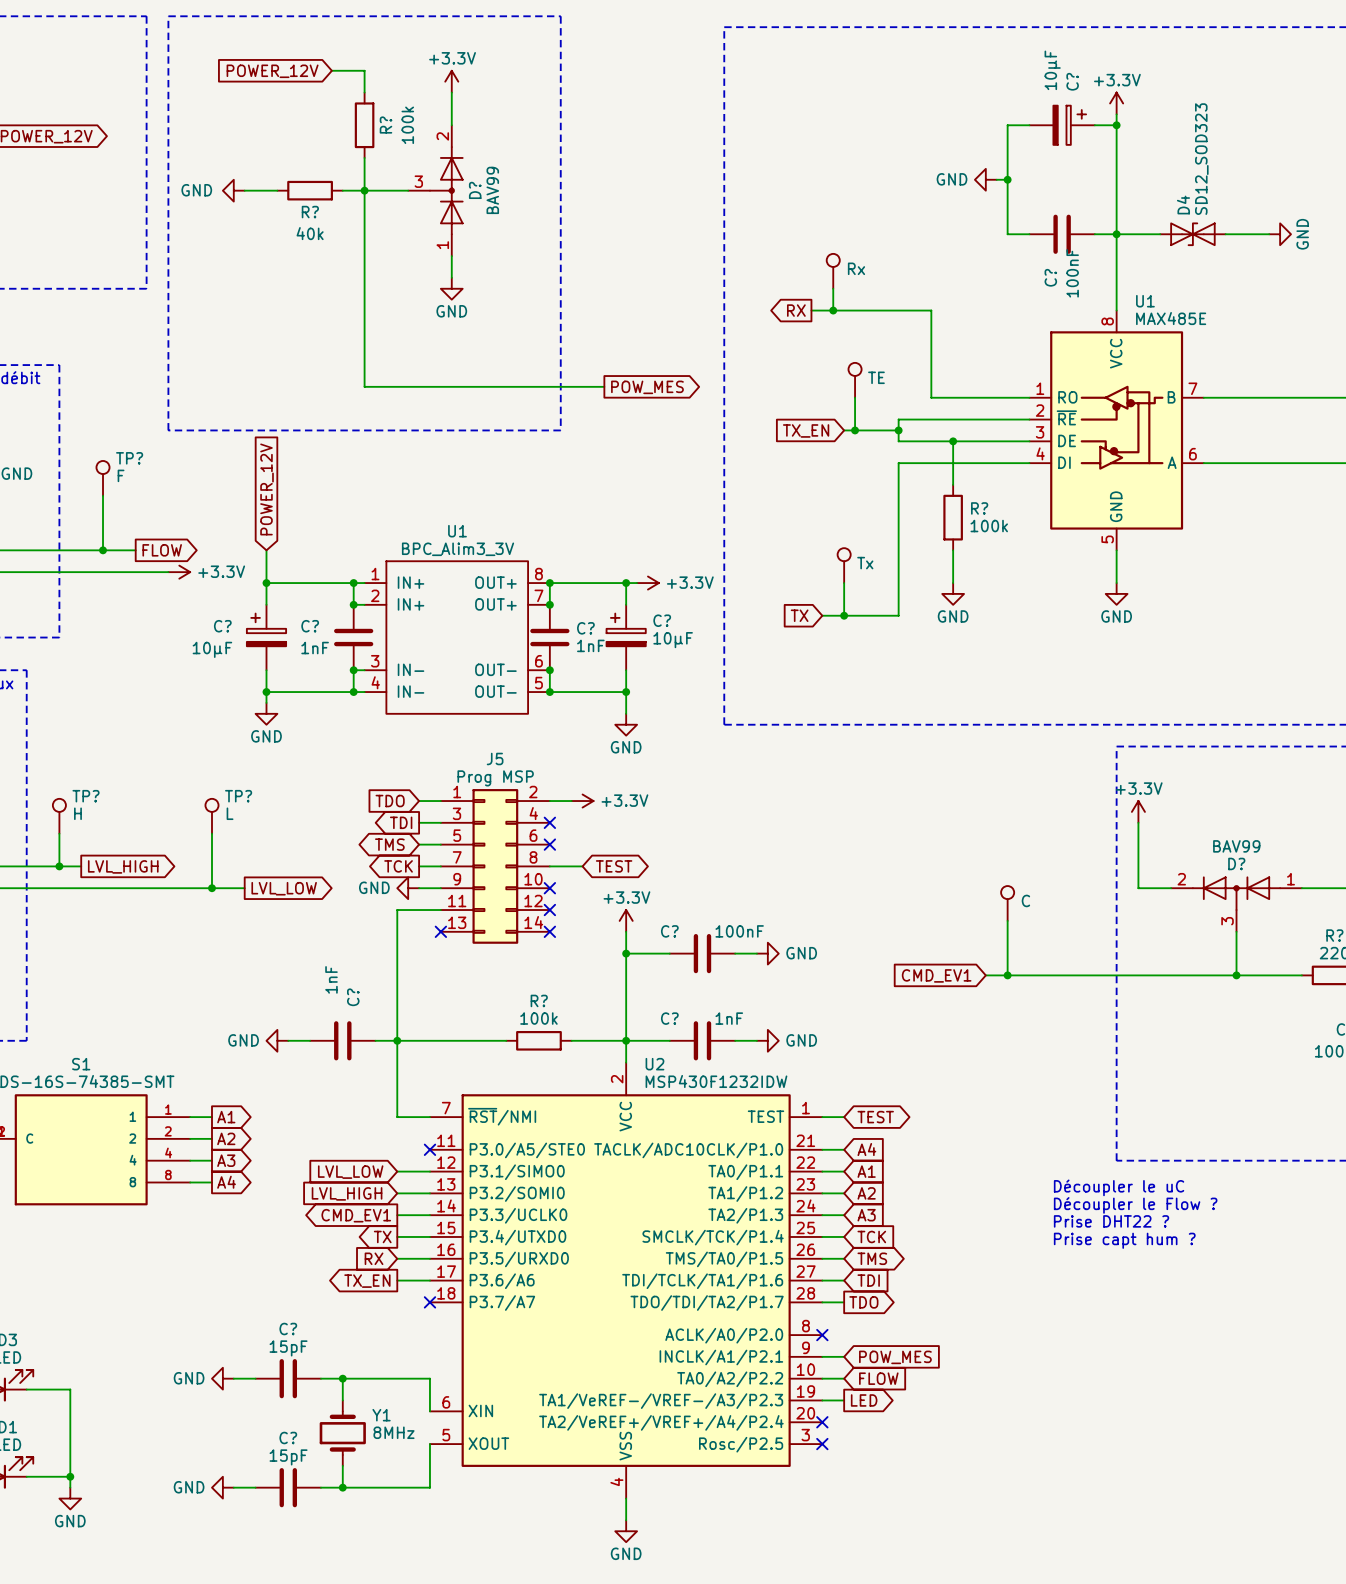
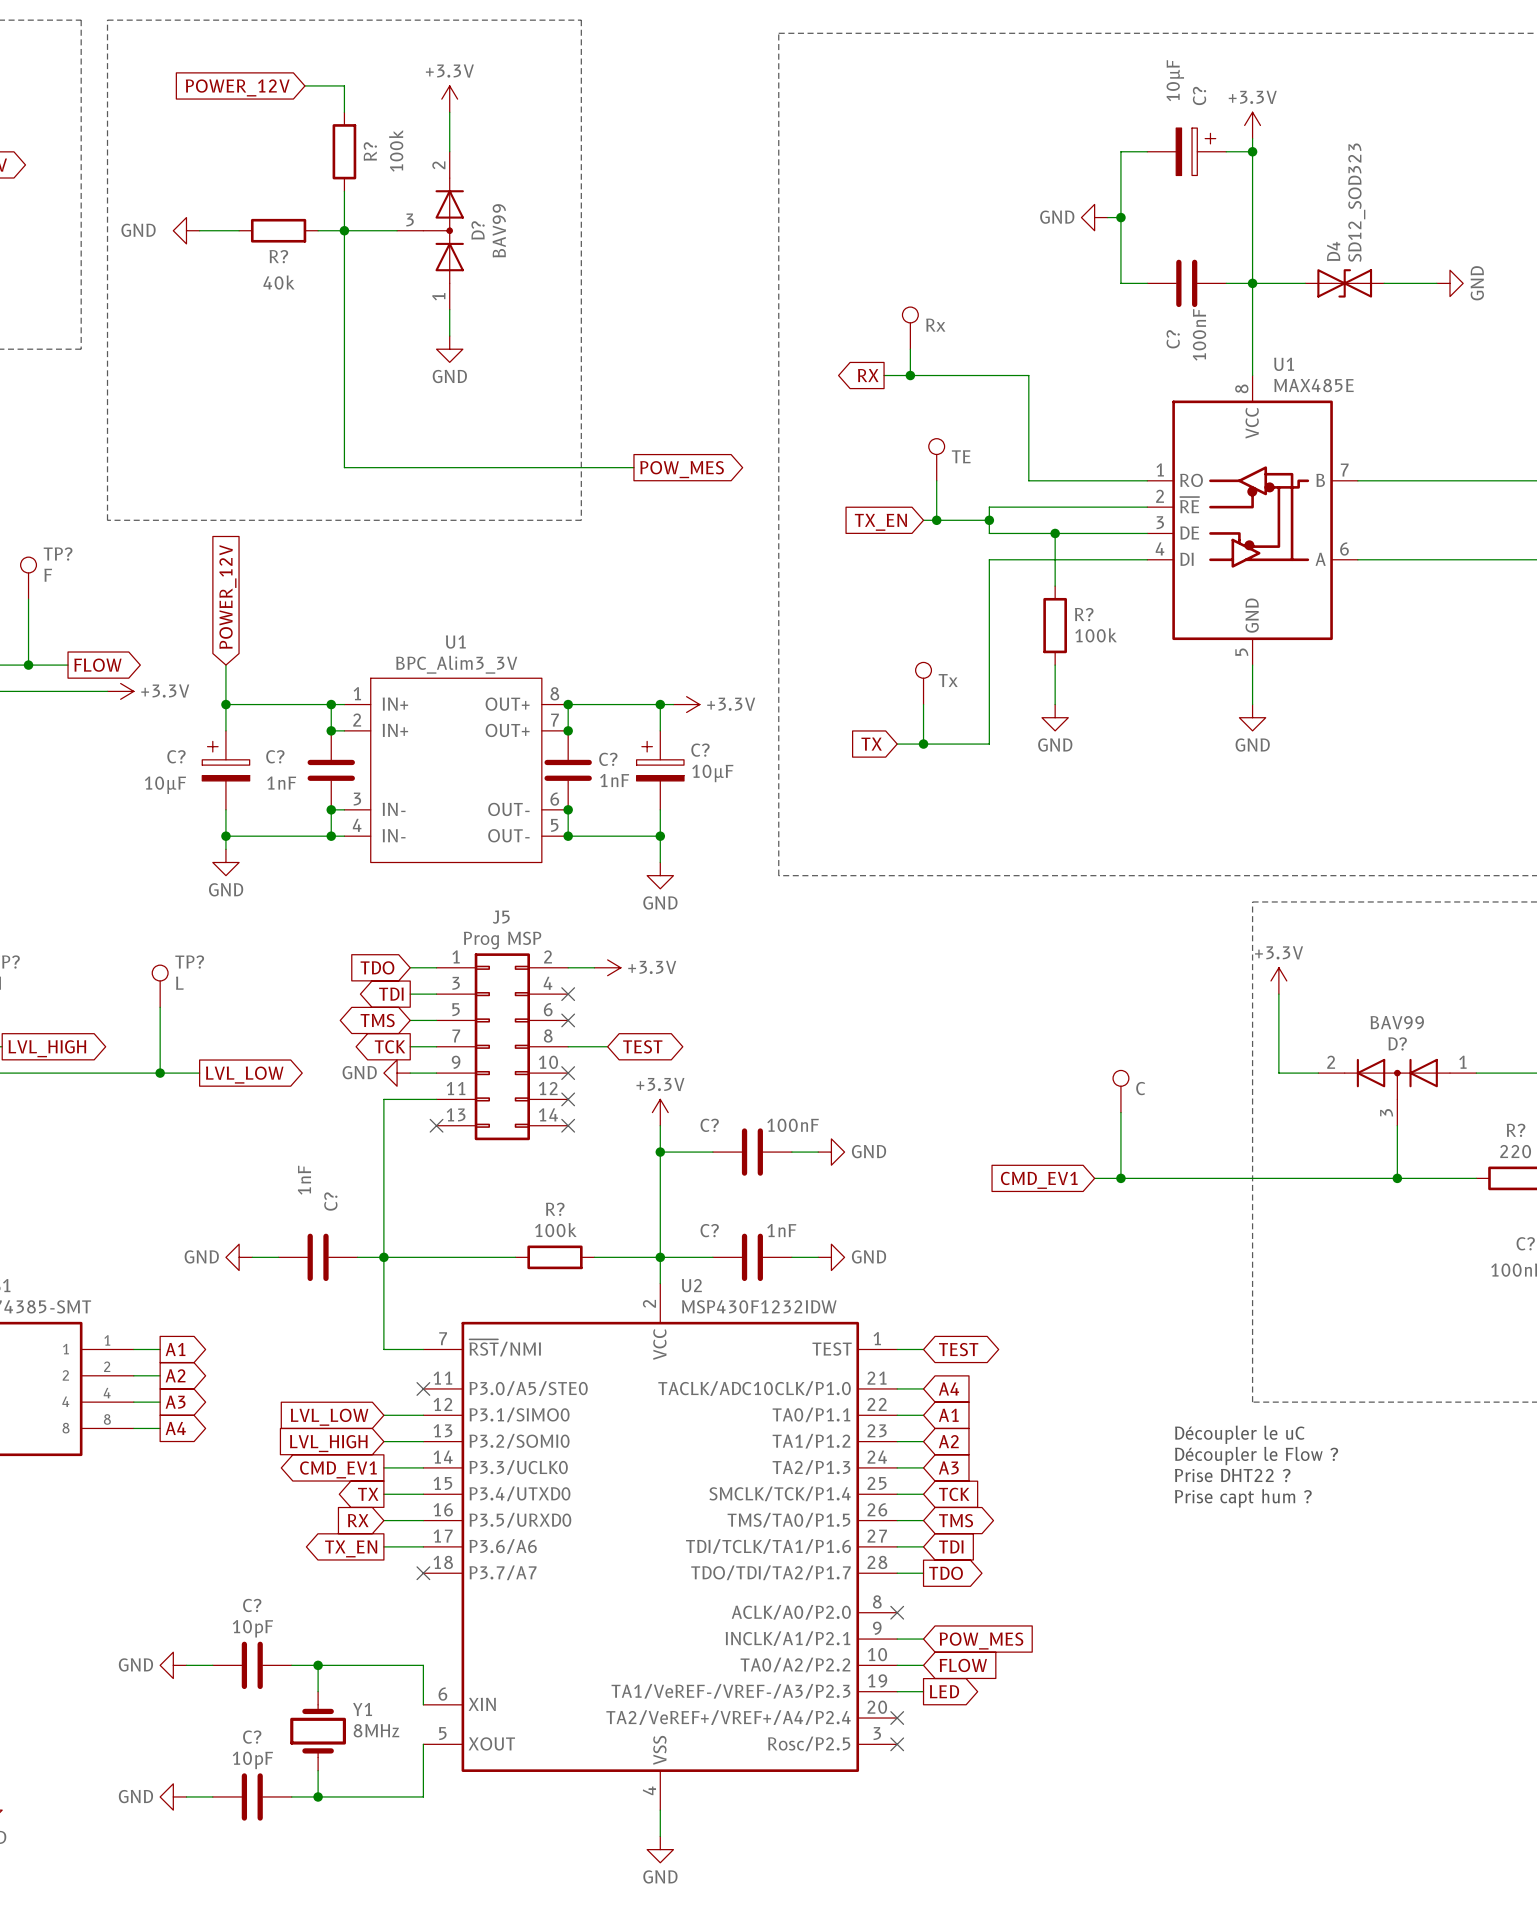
C? value: 15pF (288, 1348) -> 10pF (252, 1628)
C? value: 15pF (288, 1457) -> 10pF (252, 1760)

